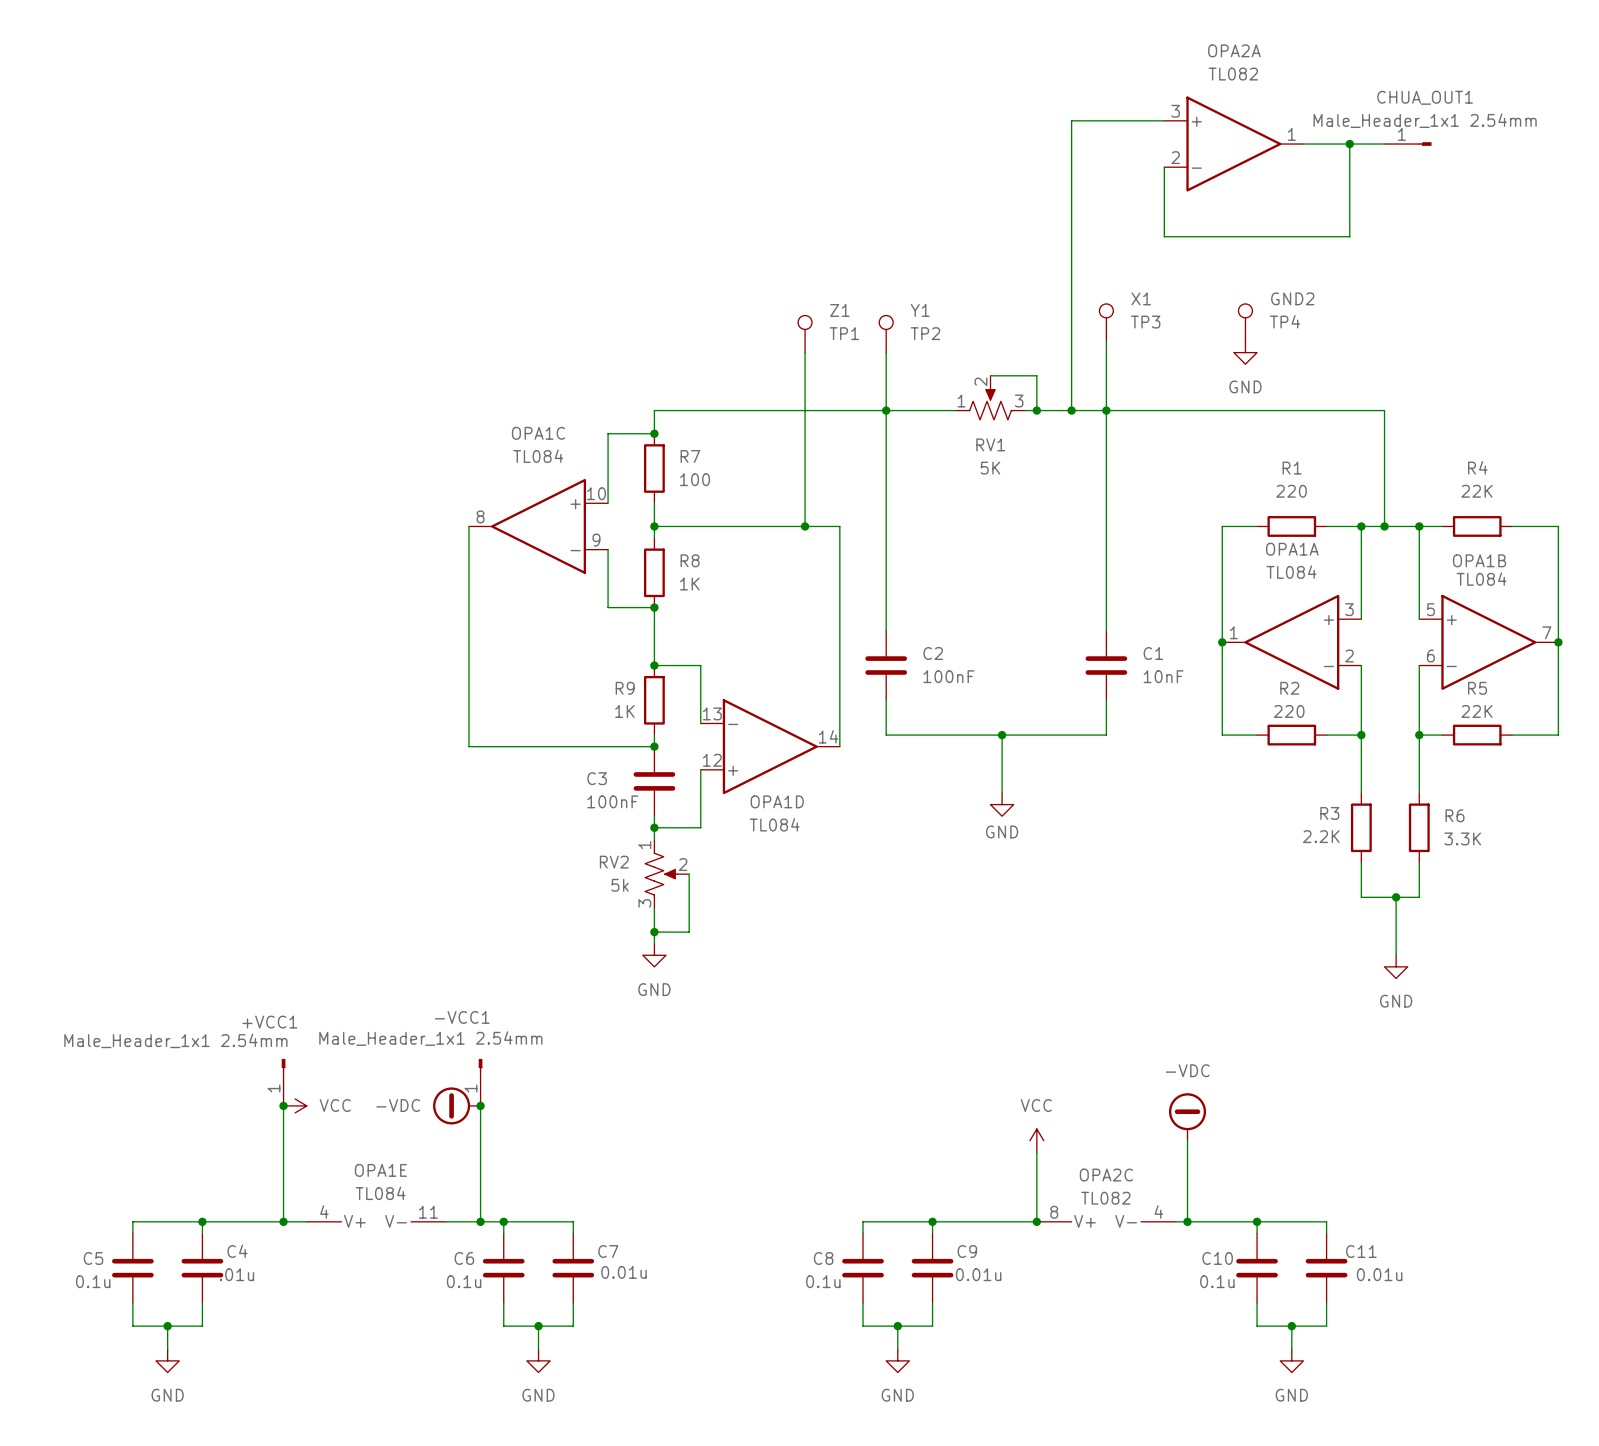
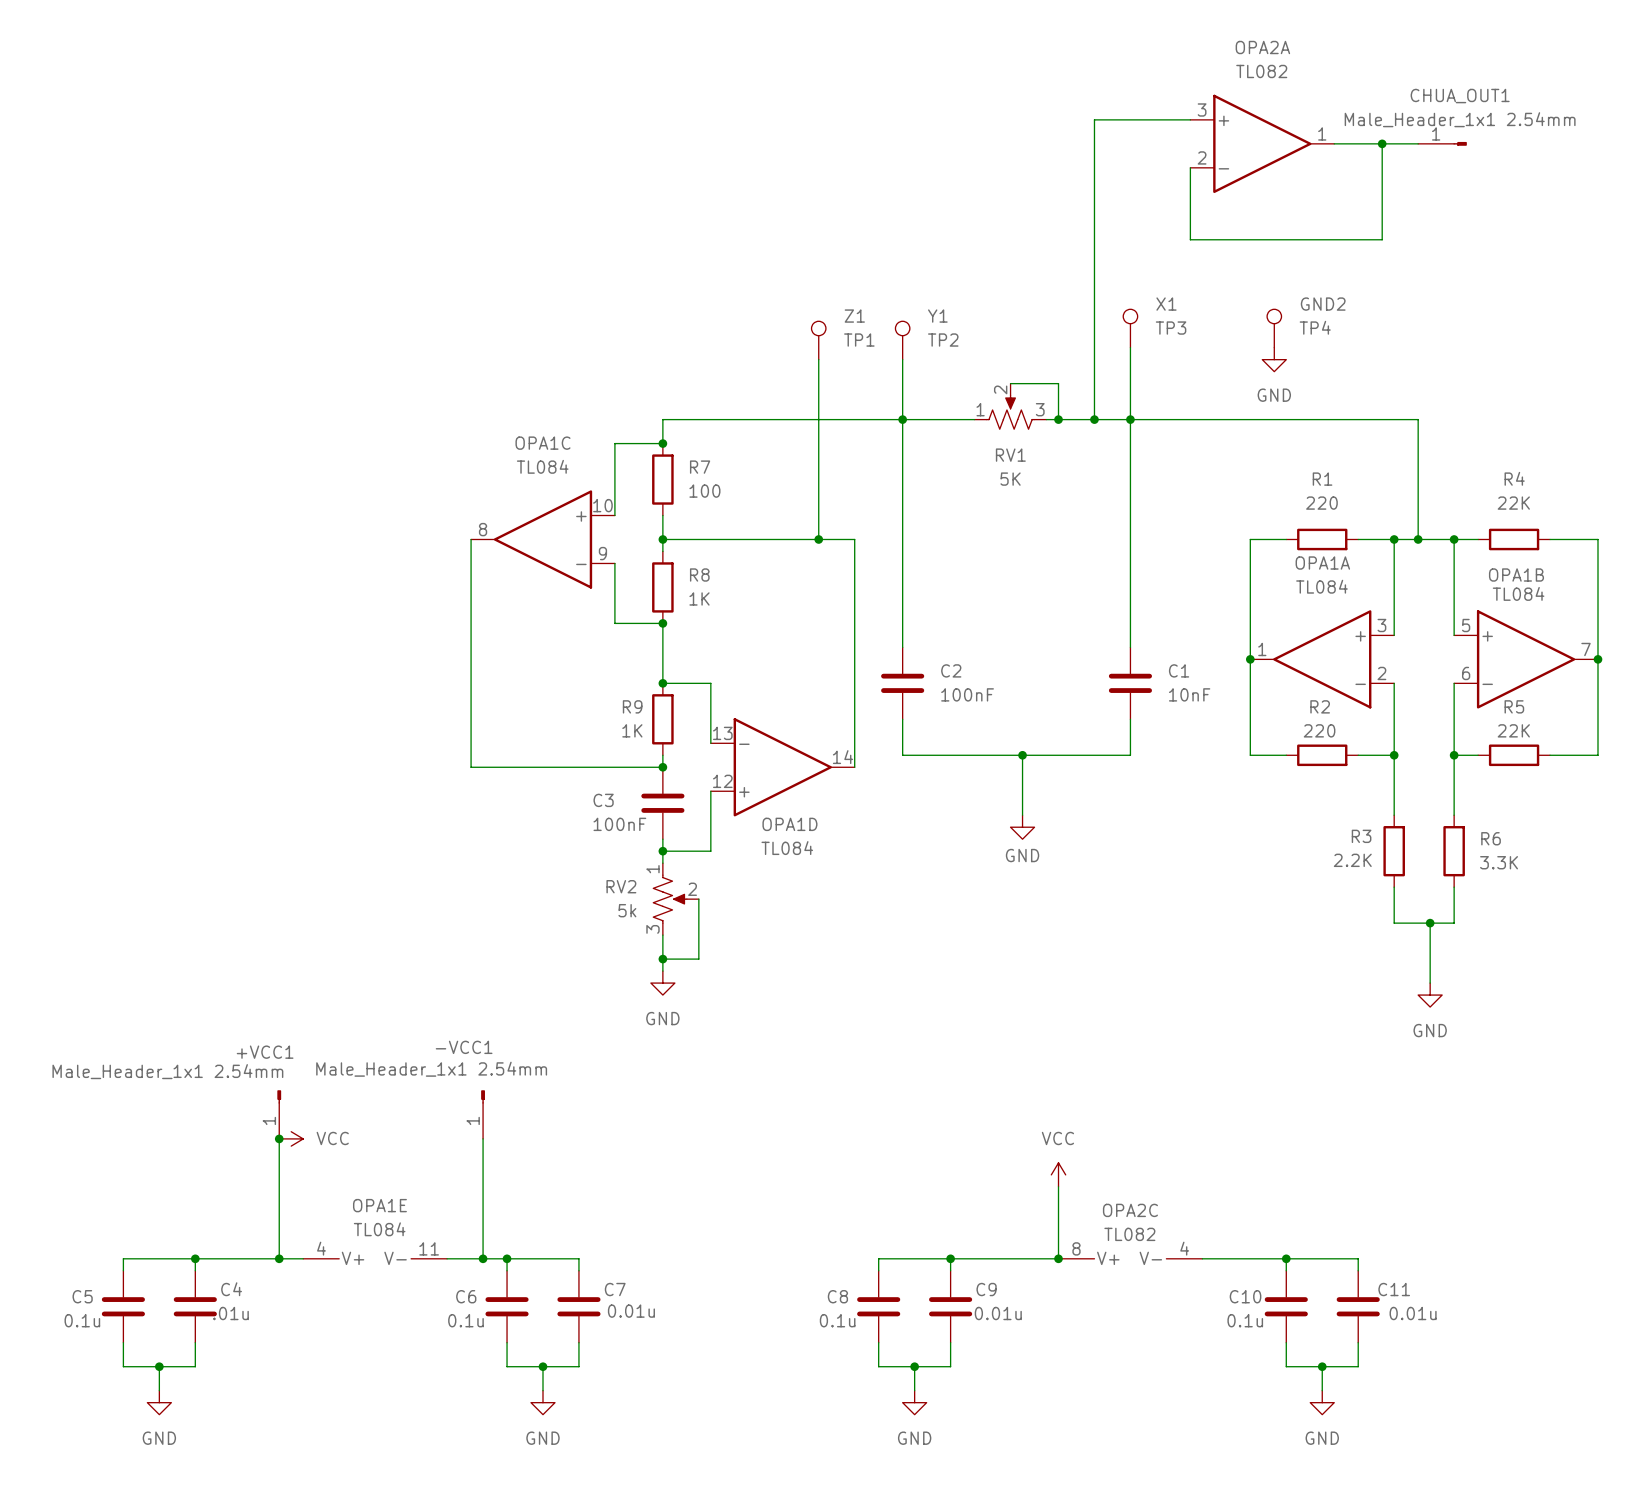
power symbol: -VDC (456, 1105) -> none
junction: (480, 1105) -> none
power symbol: -VDC (1187, 1116) -> none
wire: (1187, 1140) (1187, 1221) -> none
junction: (1187, 1221) -> none

